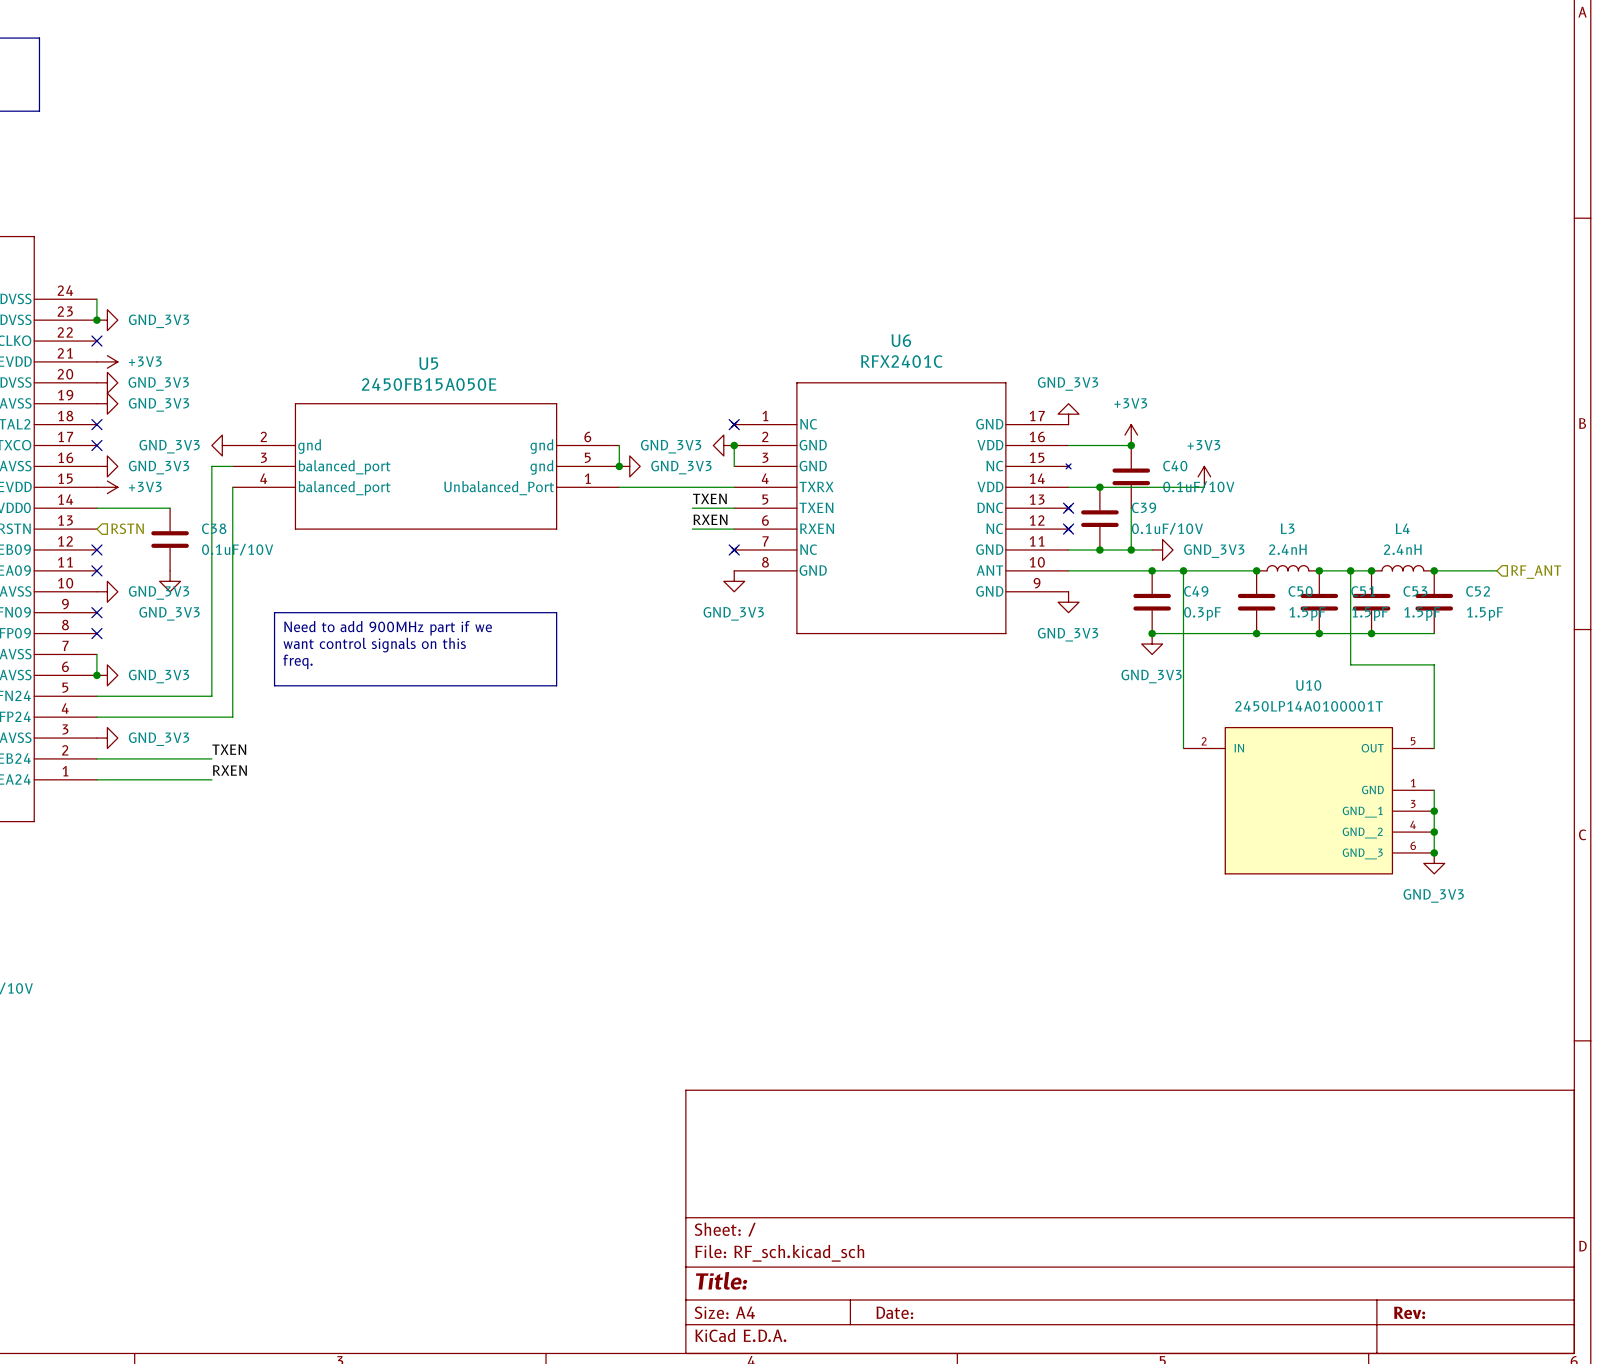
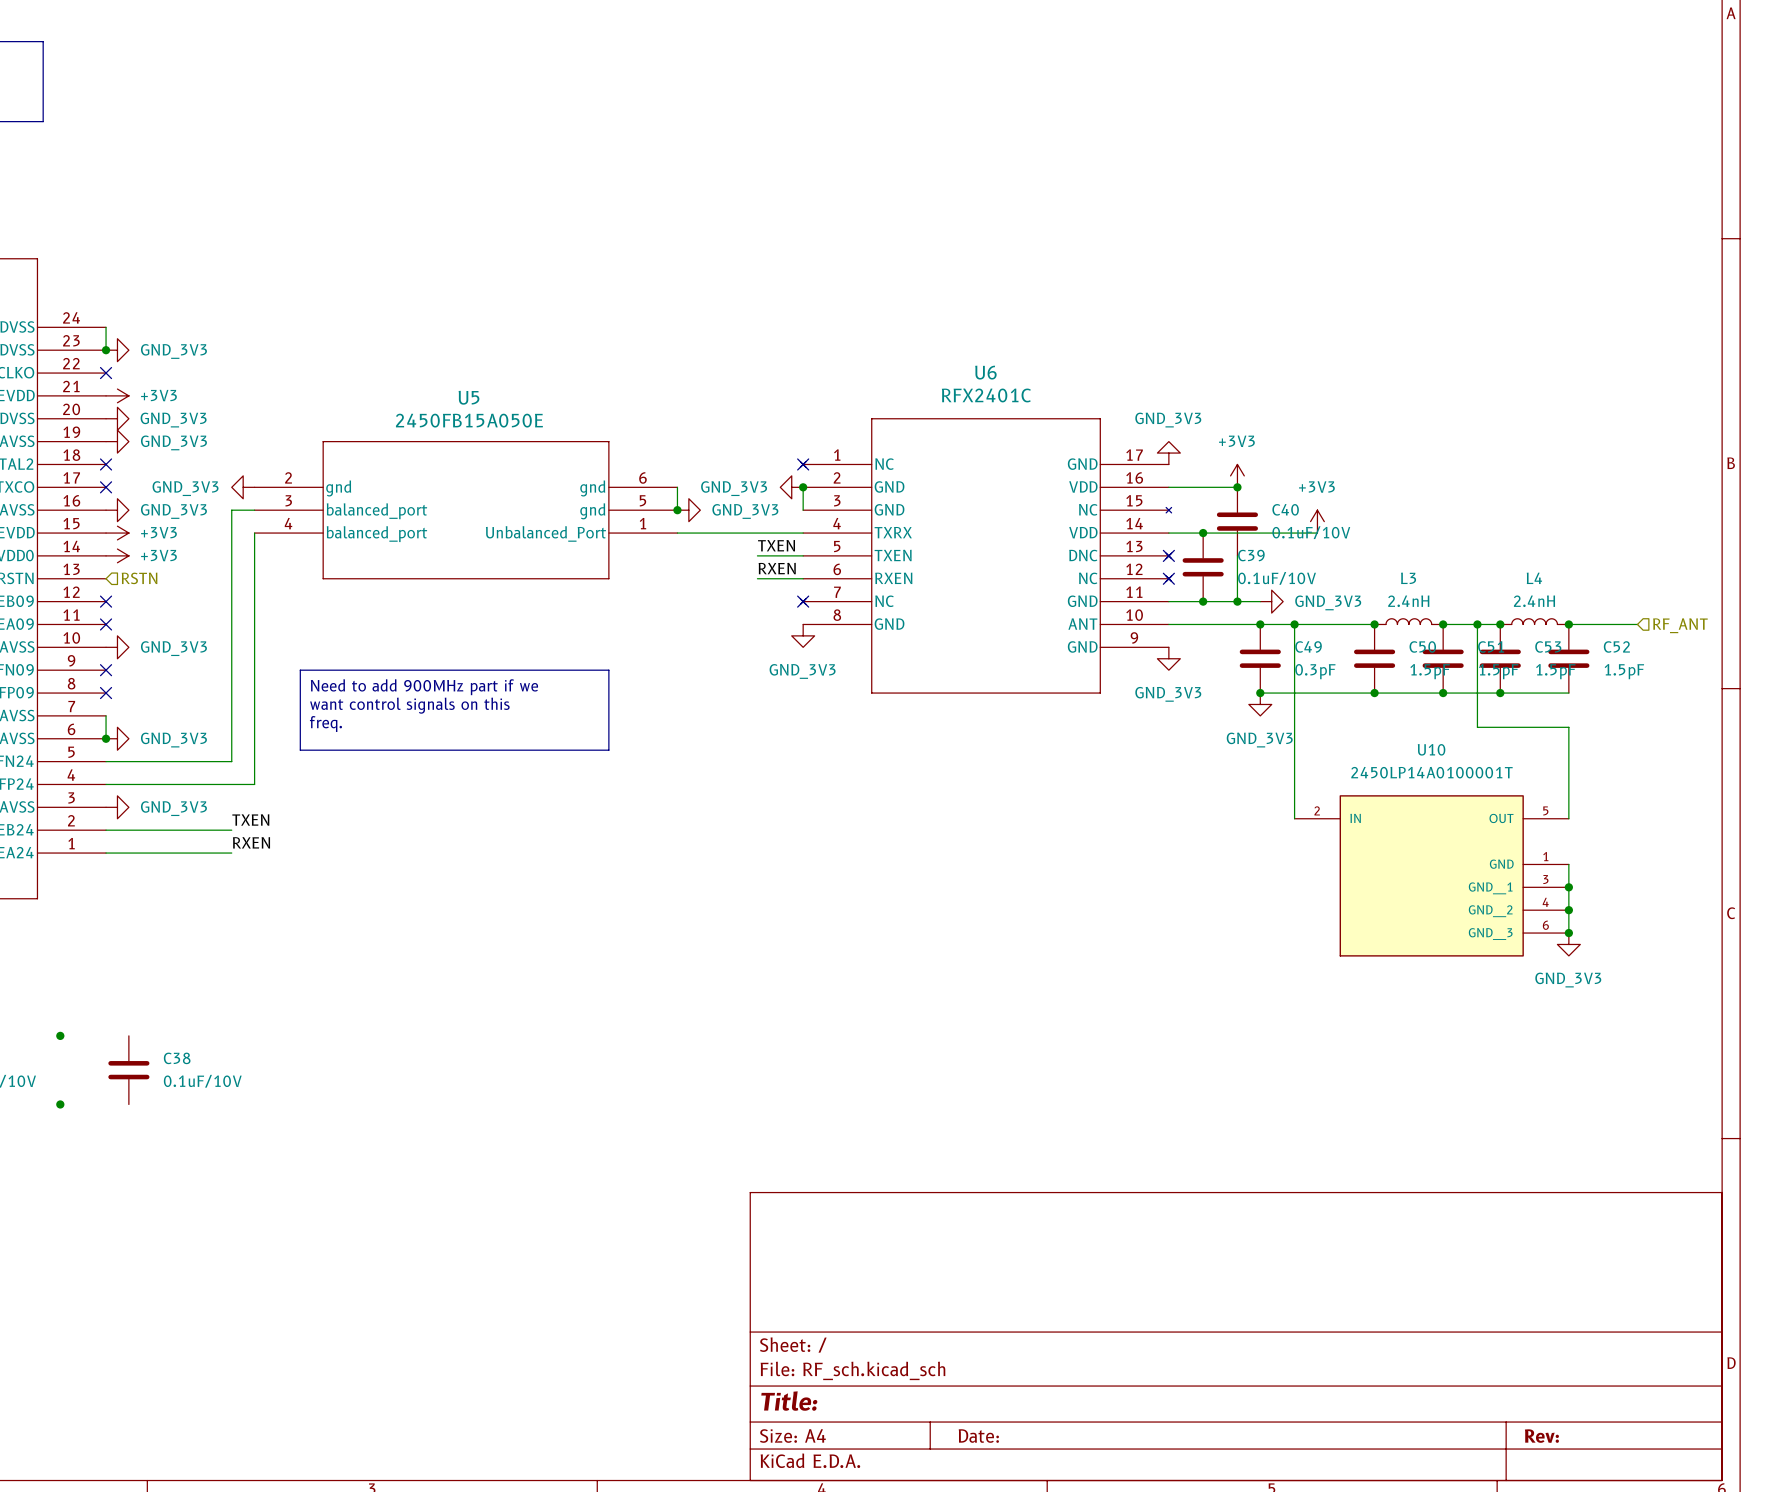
wire: (96, 508) (170, 508) -> none
power symbol: none -> +3V3 (117, 555)
C38 position: (170, 539) -> (128, 1070)
power symbol: GND_3V3 (170, 581) -> none
junction: none -> (60, 1035)
junction: none -> (60, 1104)

